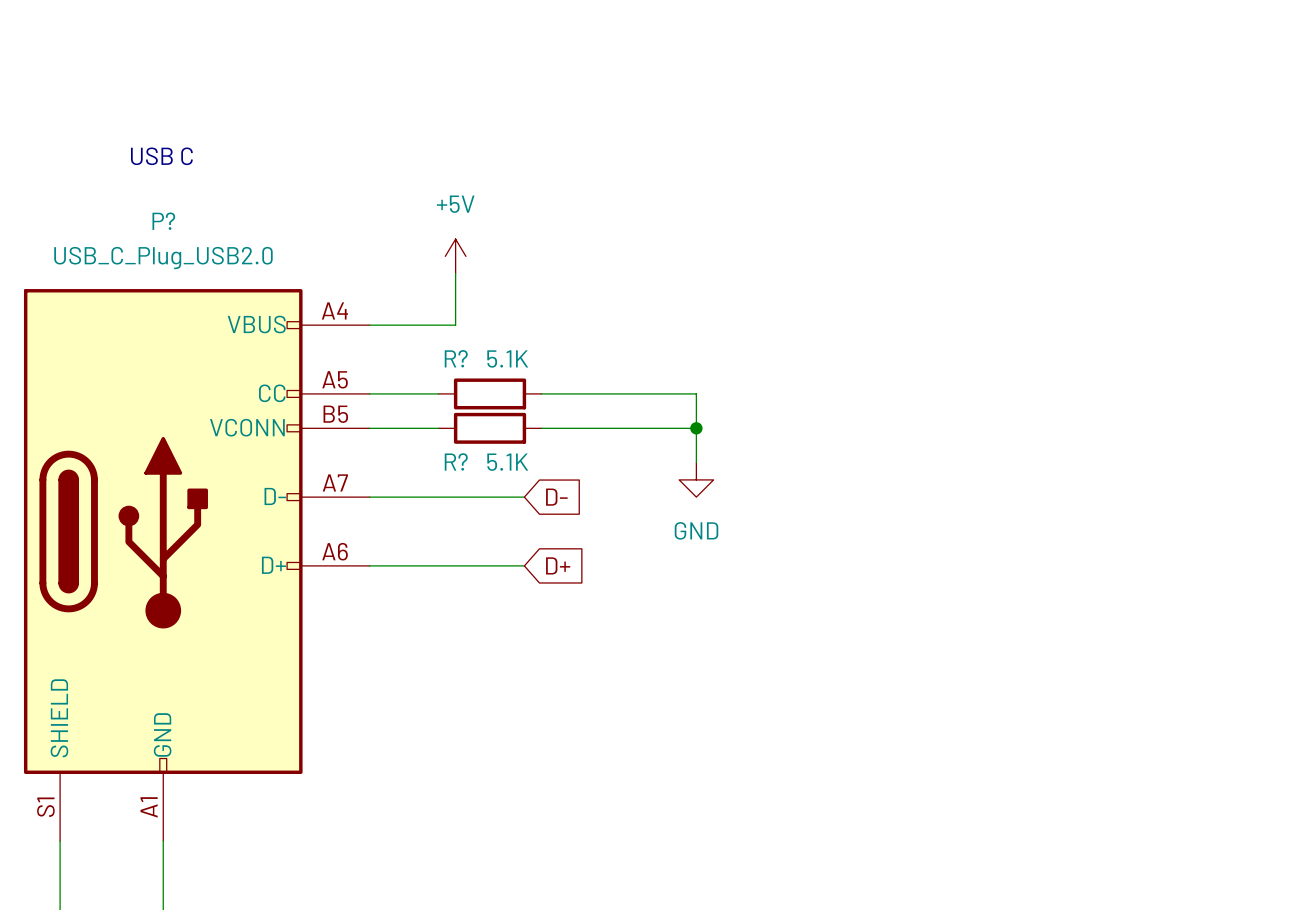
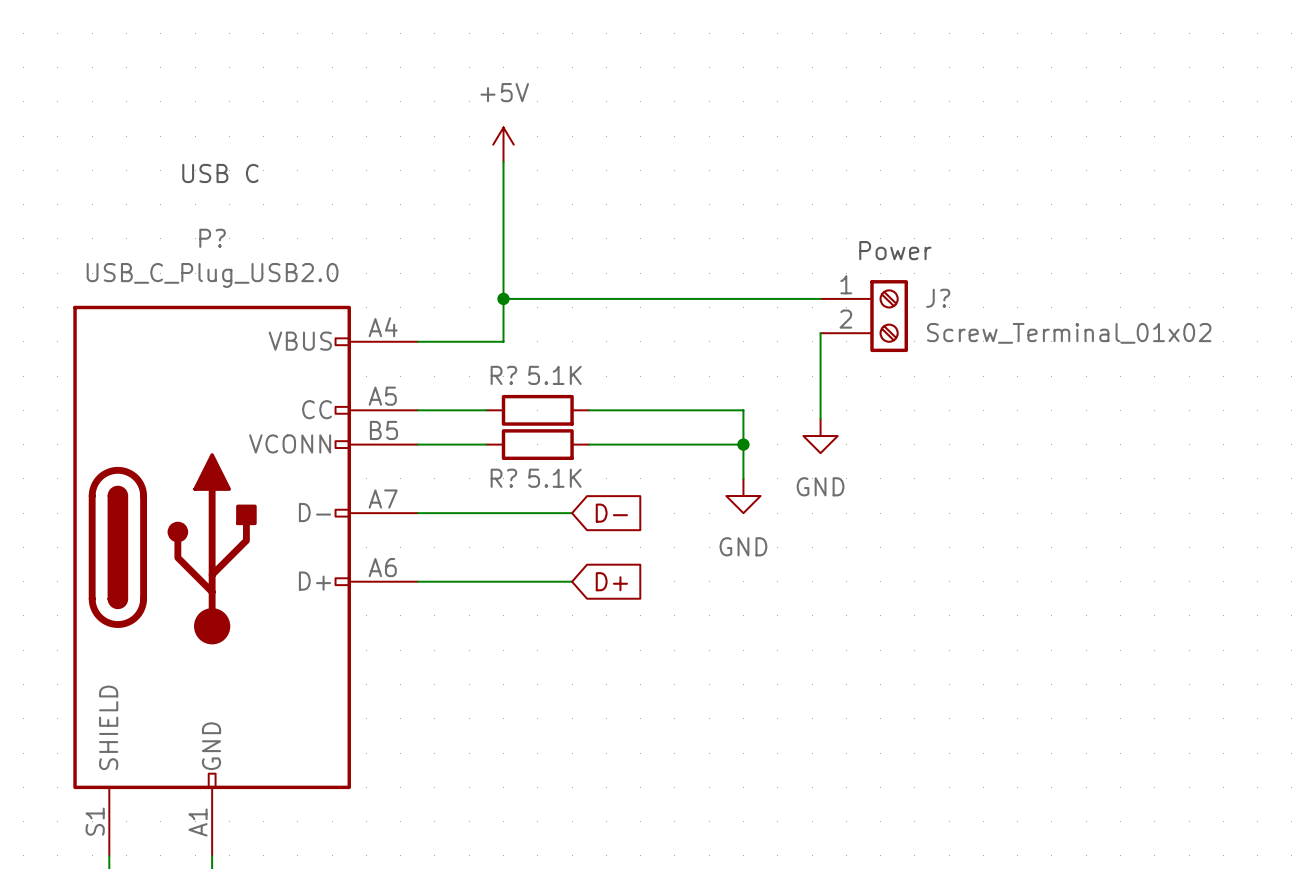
wire: none -> (503, 161) (503, 290)
text: none -> Power (895, 250)
power symbol position: +5V (455, 256) -> +5V (503, 144)
wire: none -> (503, 298) (820, 298)
junction: none -> (503, 298)
J?: none -> Screw_Terminal_01x02 (864, 316)
wire: none -> (820, 333) (820, 418)
power symbol: none -> GND (820, 436)

